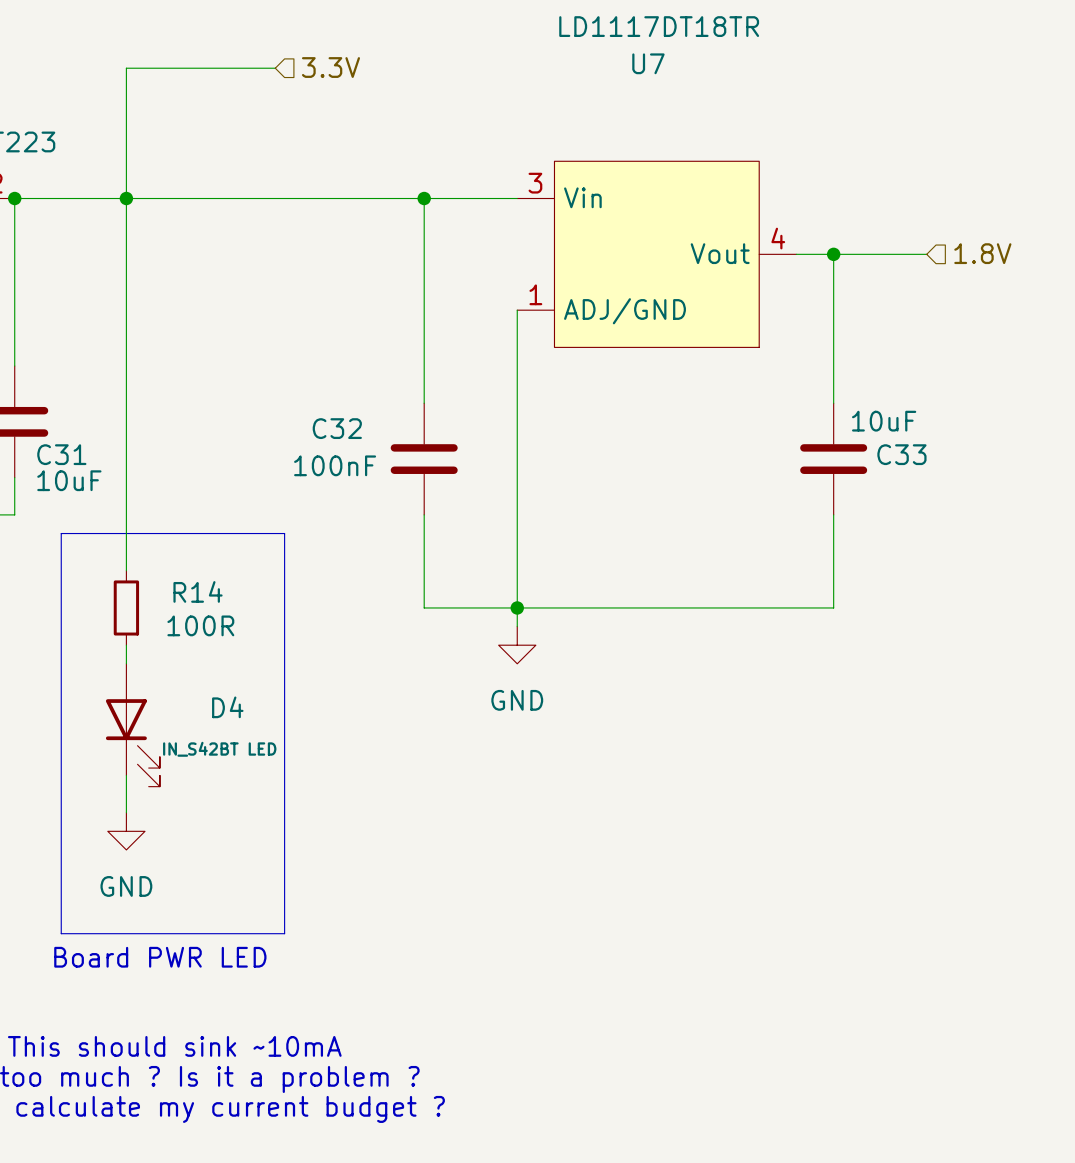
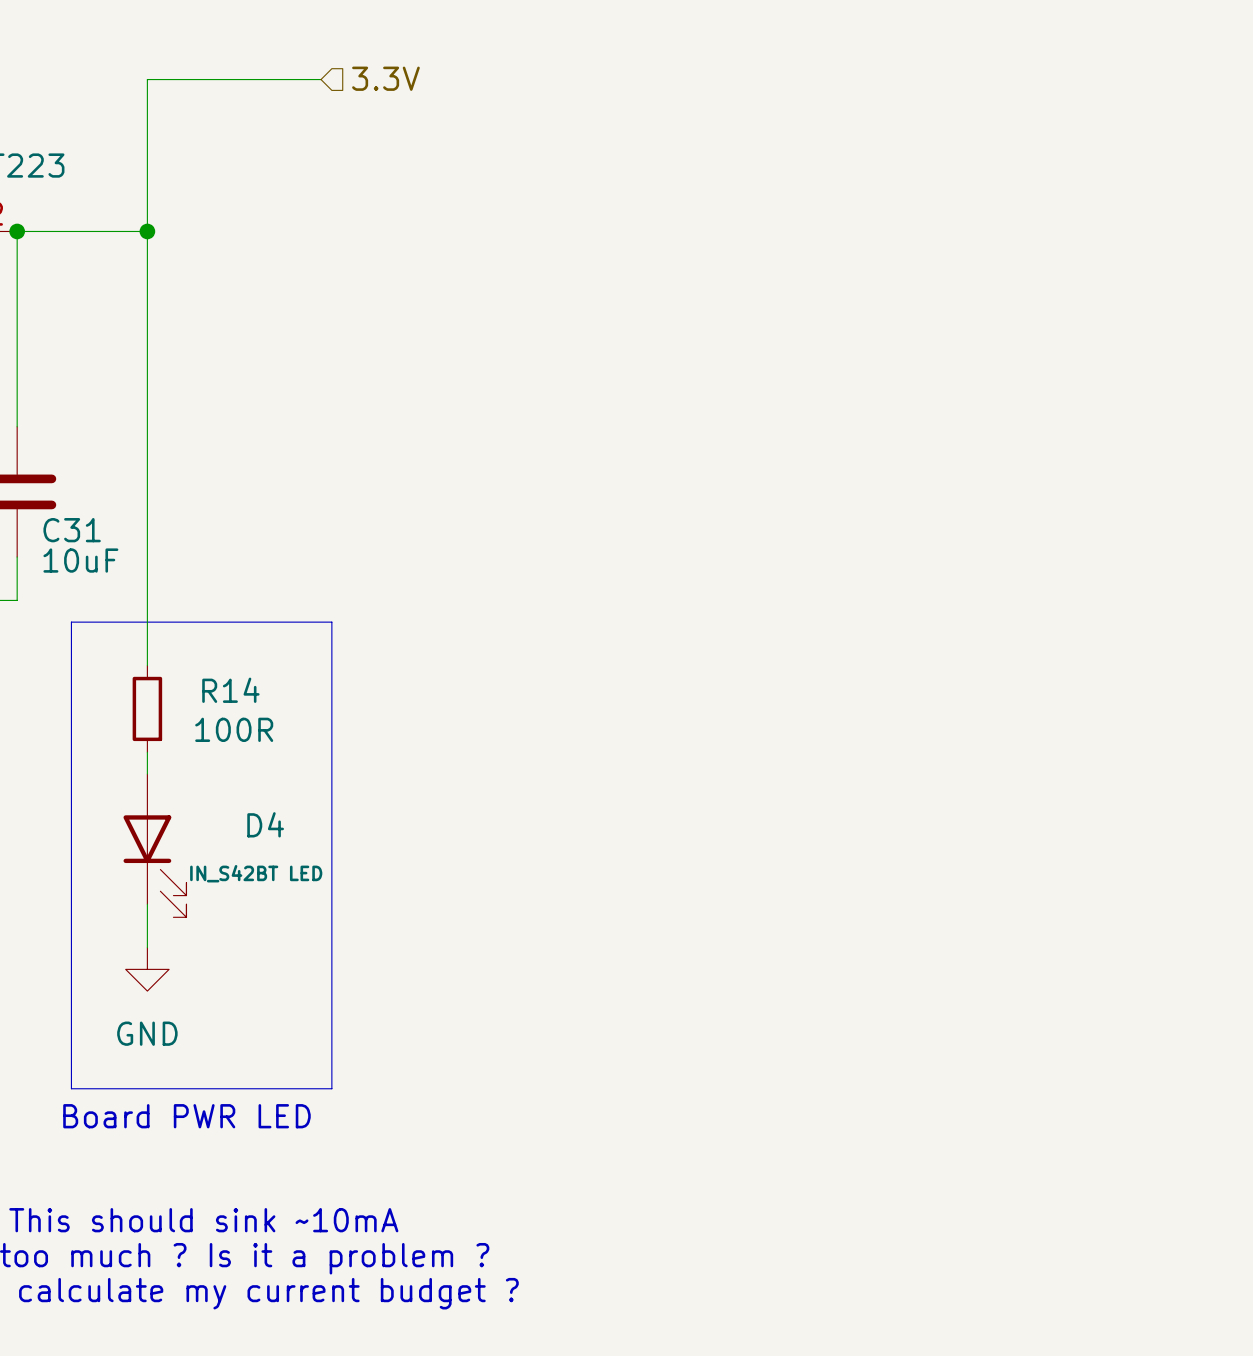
wire: (126, 198) (517, 198) -> none
wire: (424, 198) (424, 403) -> none
junction: (424, 198) -> none
hierarchical label: 1.8V (982, 253) -> none
U7: LD1117DT18TR (656, 254) -> none
wire: (796, 254) (926, 254) -> none
wire: (833, 254) (833, 403) -> none
junction: (833, 254) -> none
wire: (517, 310) (517, 626) -> none
C32: 100nF (424, 459) -> none
C33: 10uF (833, 459) -> none
wire: (424, 514) (424, 607) (833, 607) (833, 514) -> none
junction: (517, 607) -> none
power symbol: GND (517, 645) -> none

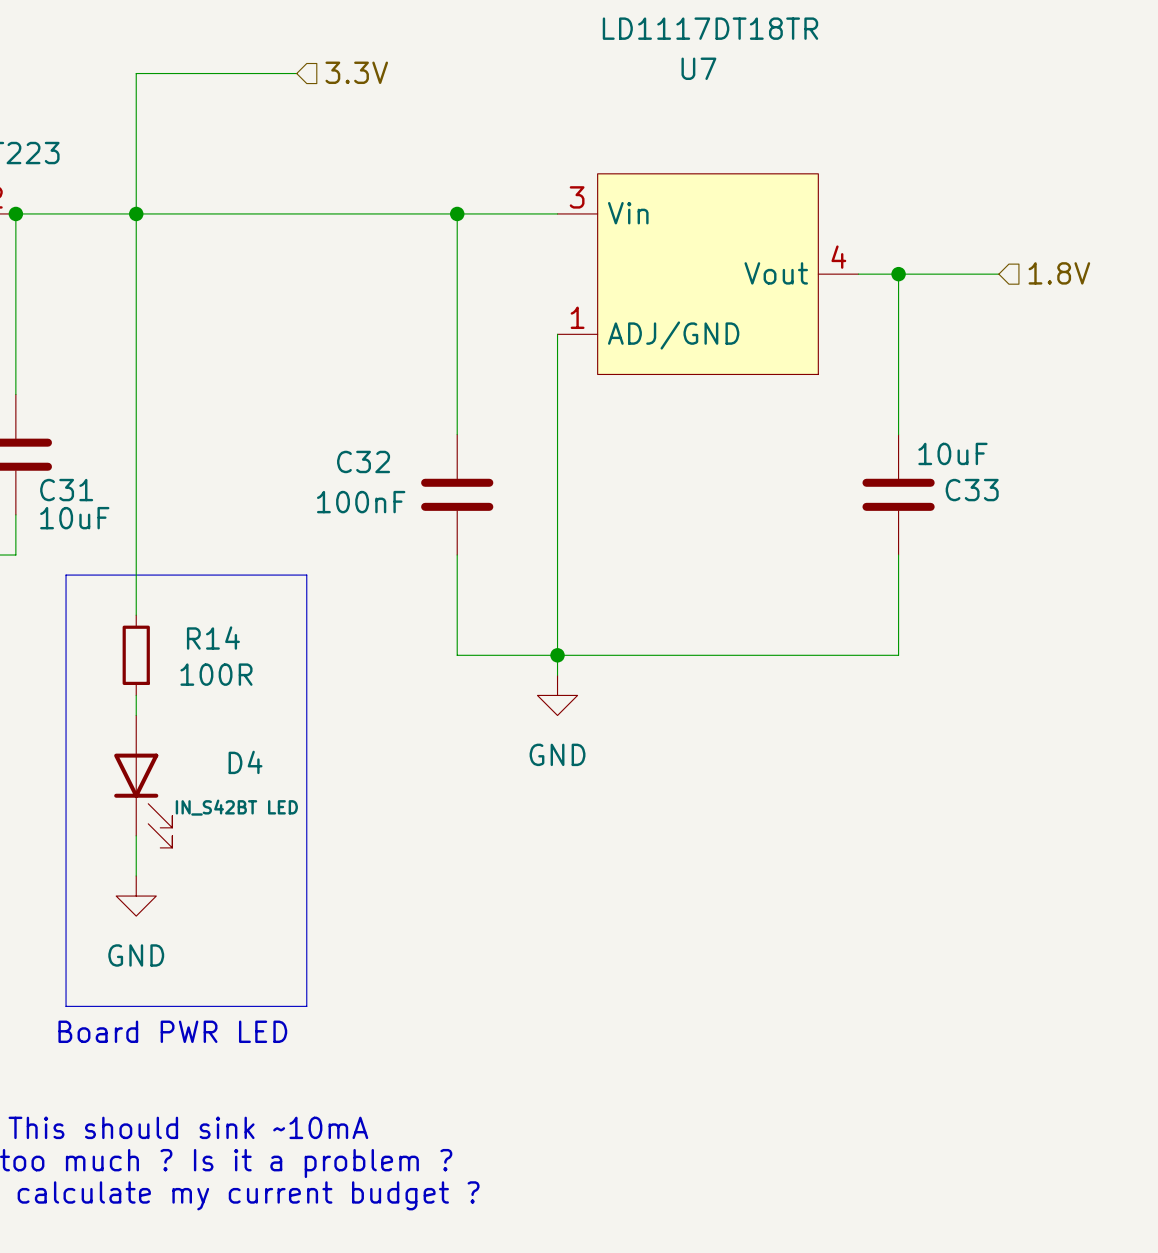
wire: none -> (136, 213) (557, 213)
wire: none -> (457, 213) (457, 434)
junction: none -> (457, 213)
hierarchical label: none -> 1.8V (1059, 273)
U7: none -> LD1117DT18TR (707, 274)
wire: none -> (858, 274) (998, 274)
wire: none -> (898, 274) (898, 434)
junction: none -> (898, 274)
wire: none -> (557, 334) (557, 675)
C32: none -> 100nF (457, 494)
C33: none -> 10uF (898, 494)
wire: none -> (457, 555) (457, 655) (898, 655) (898, 555)
junction: none -> (557, 655)
power symbol: none -> GND (557, 695)

